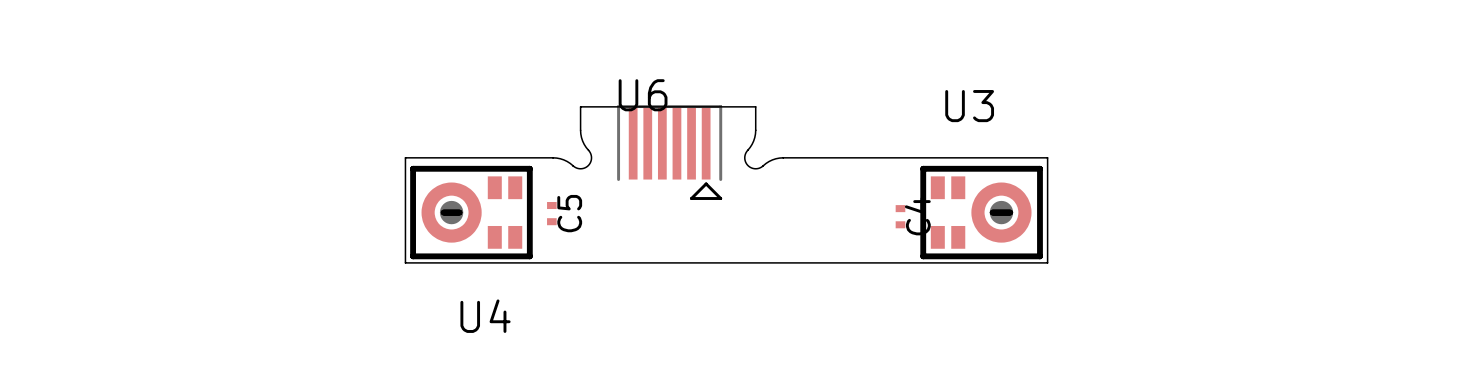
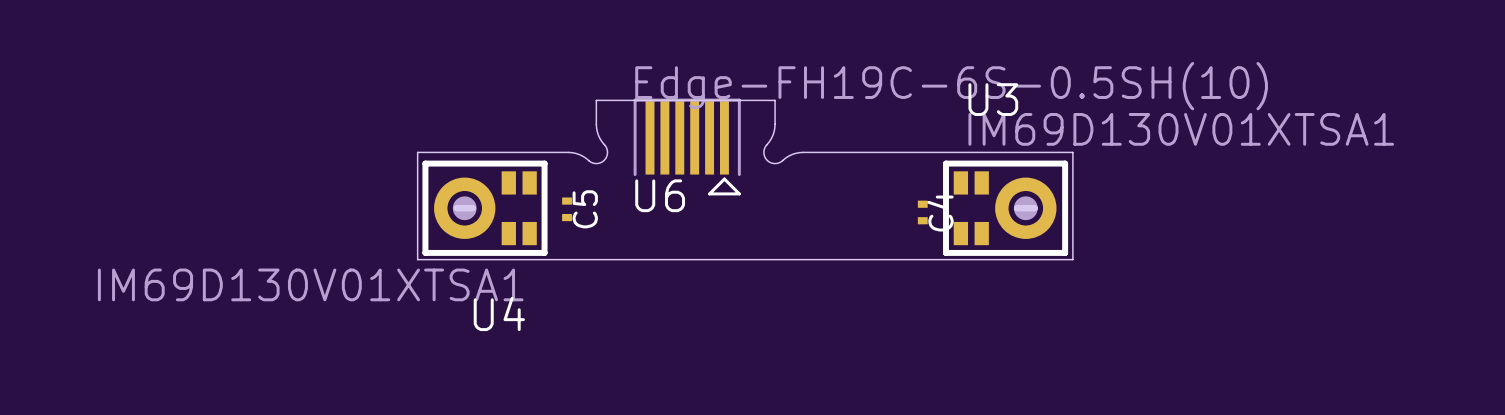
U6 value: none -> Edge-FH19C-6S-0.5SH(10) (951, 86)
U6 name position: U6 (643, 95) -> U6 (660, 195)
U3 value: none -> IM69D130V01XTSA1 (1181, 129)
U4 value: none -> IM69D130V01XTSA1 (310, 284)

